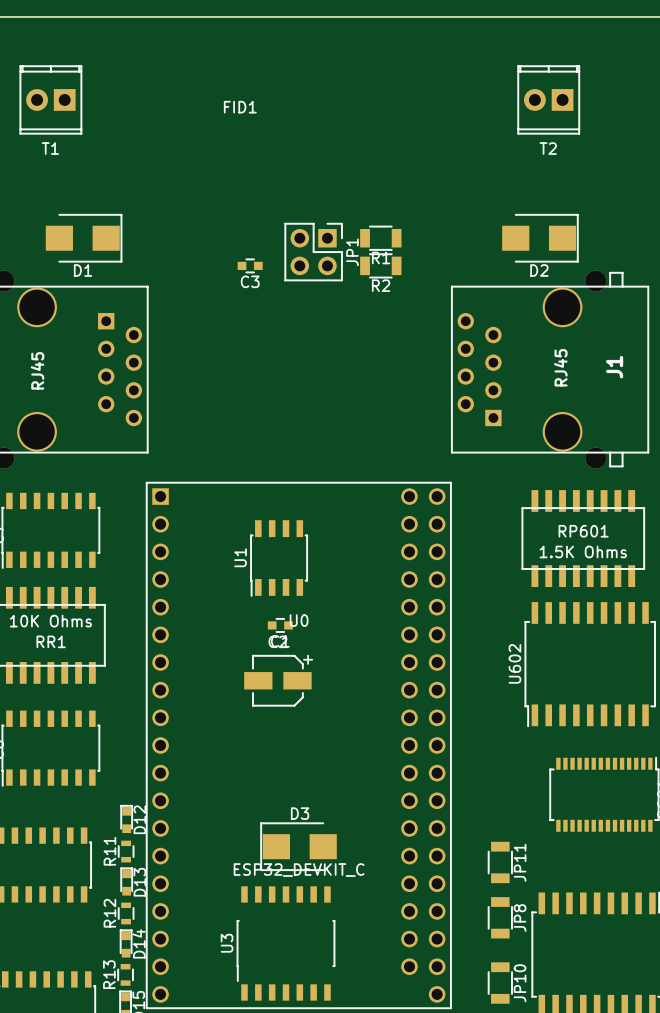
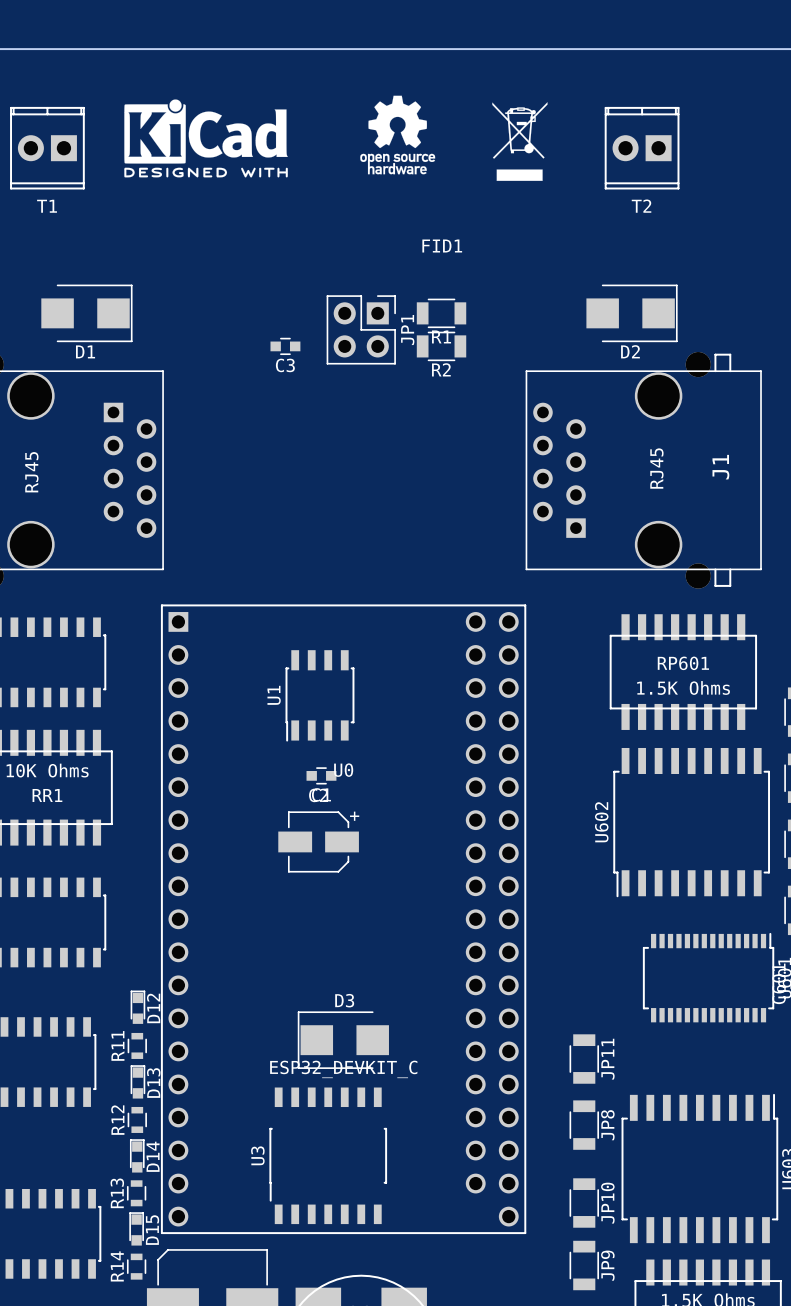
drawing: none -> [360, 95, 436, 175]
drawing: none -> [124, 99, 288, 178]
drawing: none -> [492, 102, 548, 181]
FID1 position: (240, 107) -> (442, 246)

